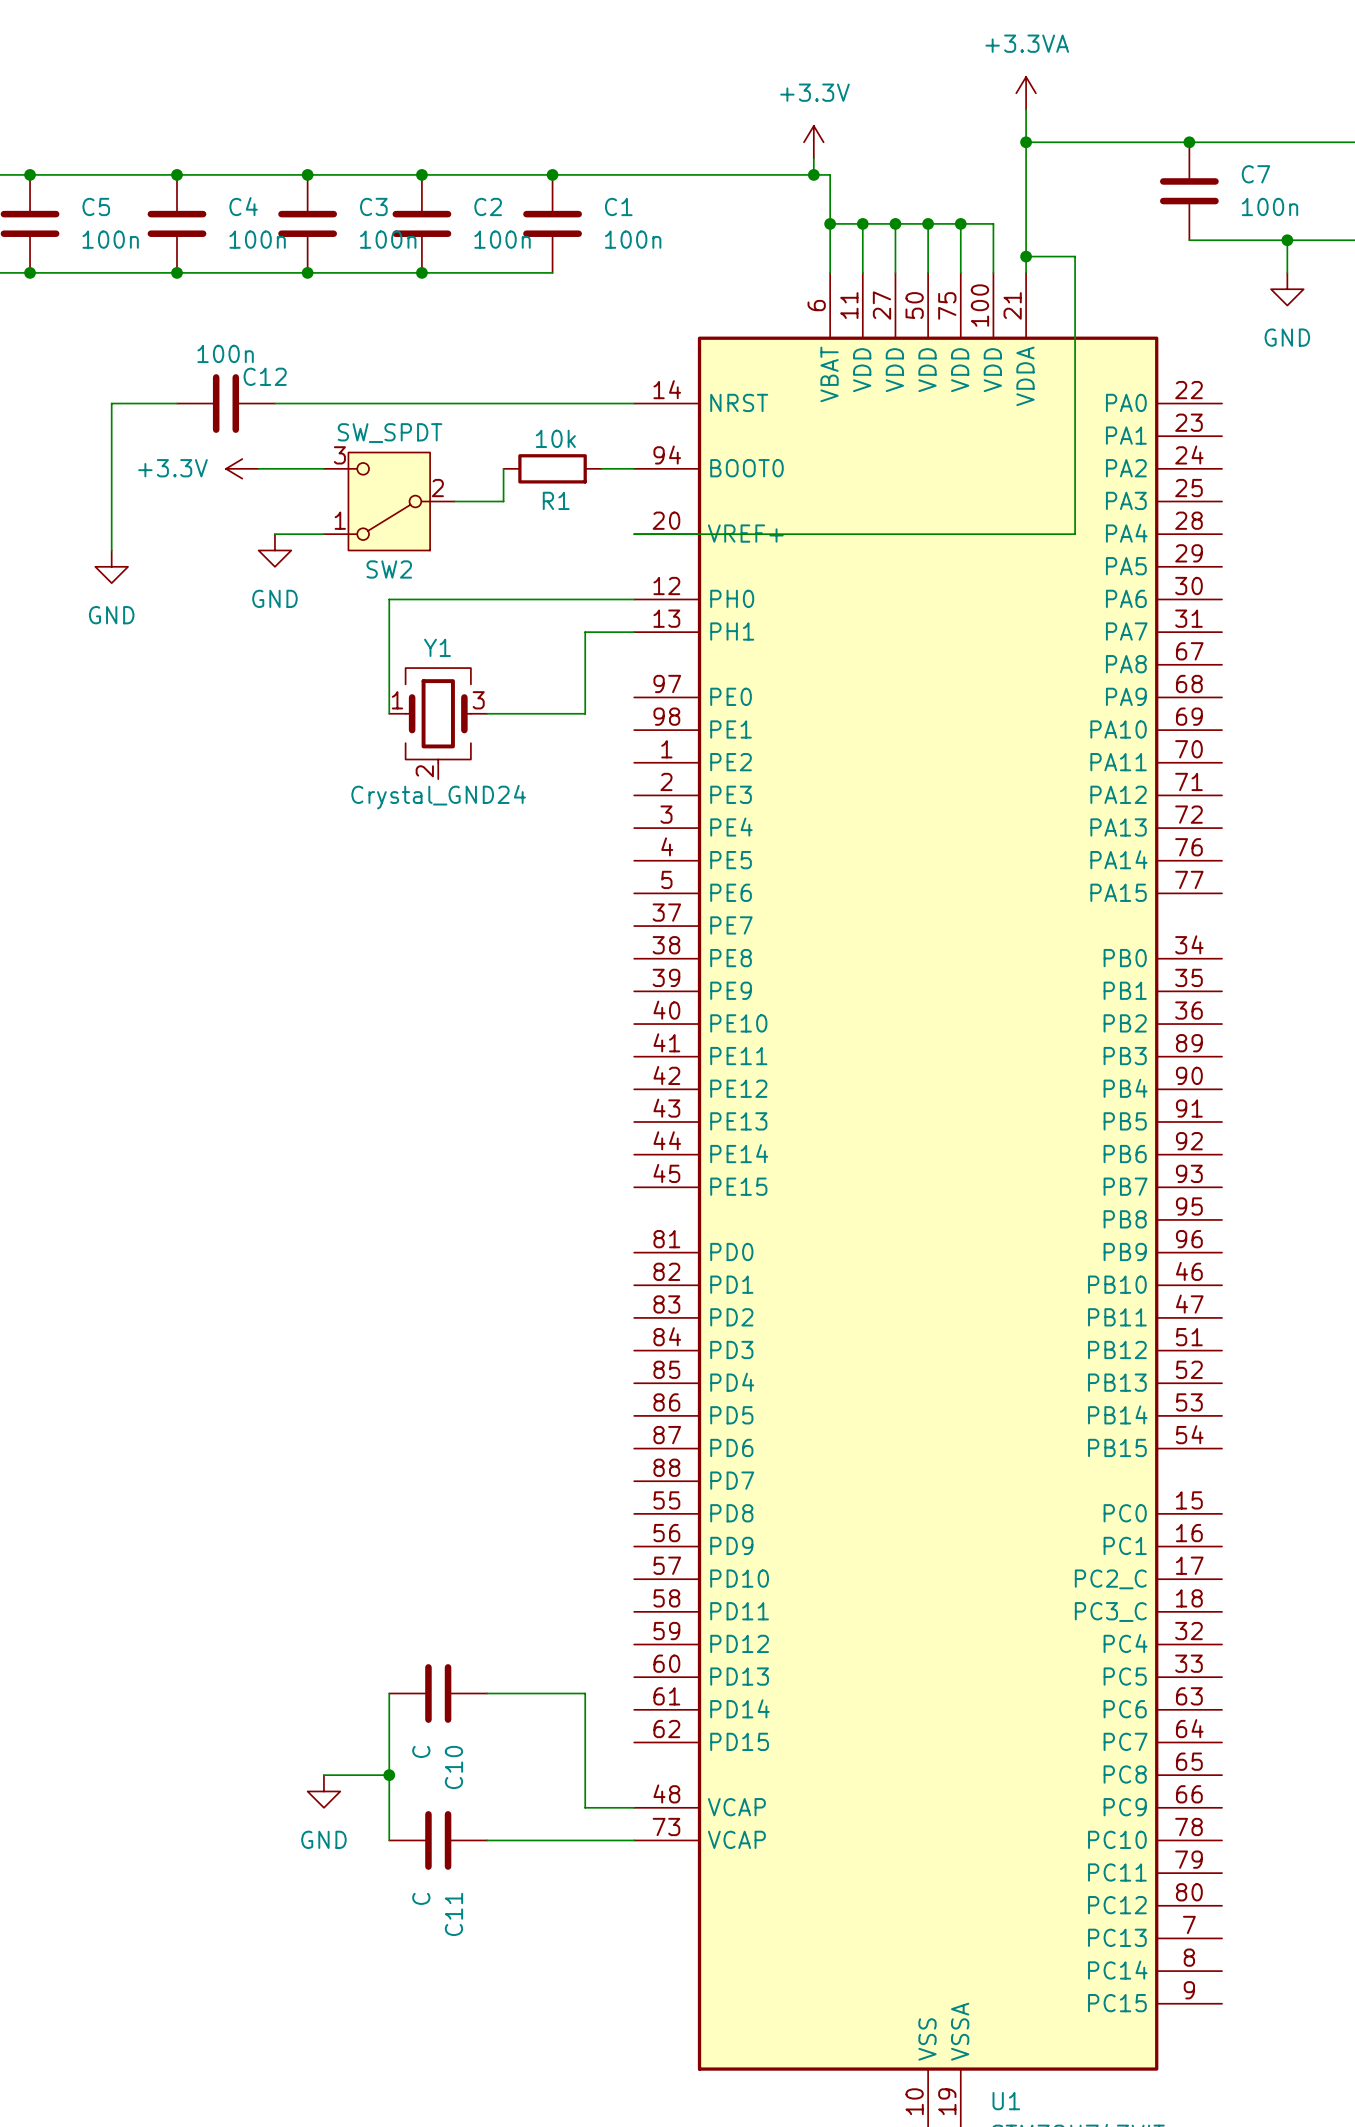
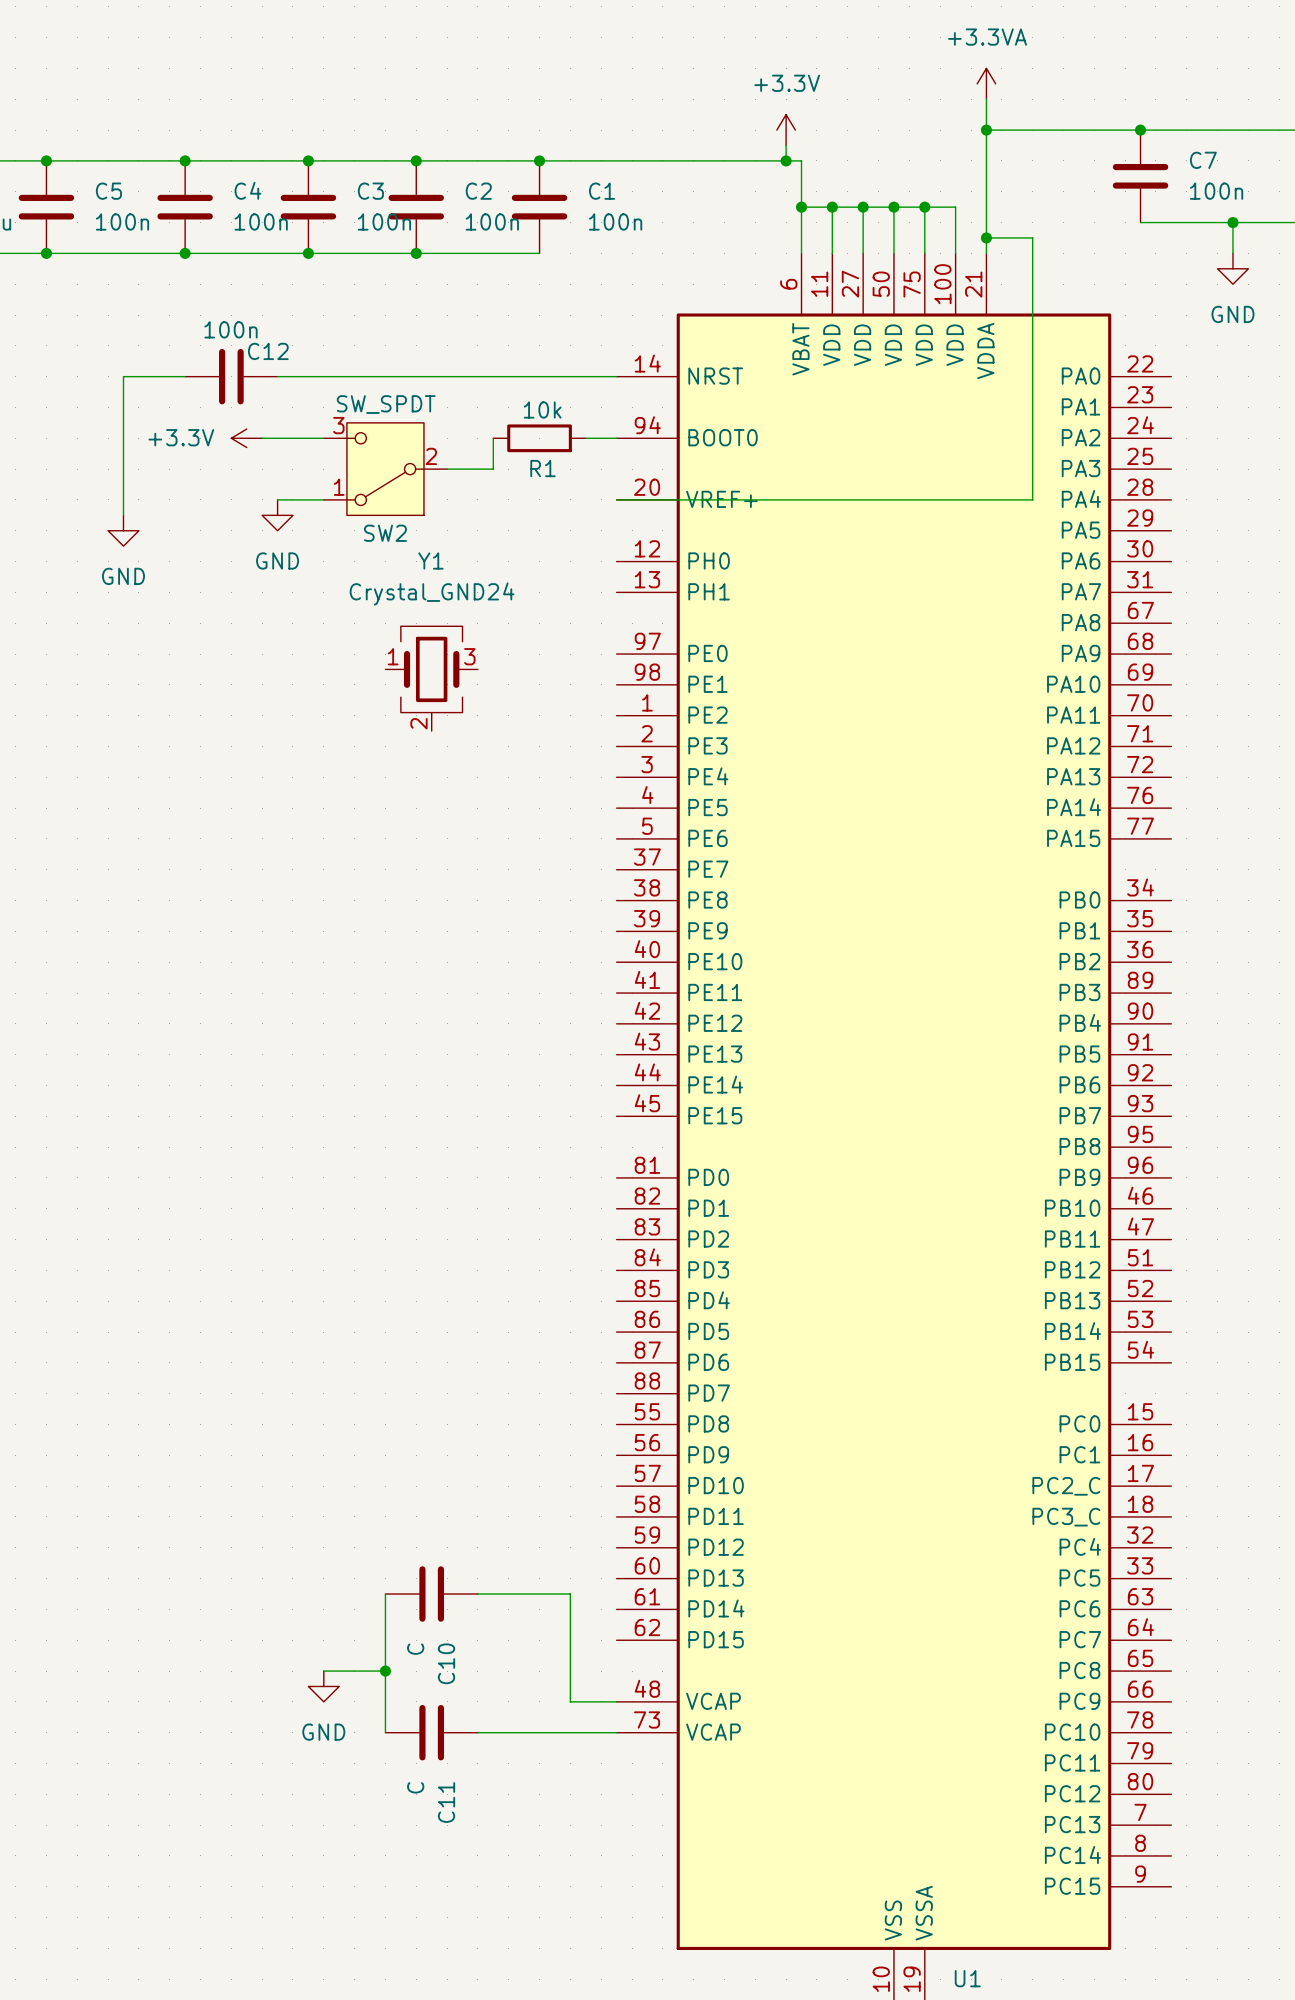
wire: (634, 599) (389, 599) (389, 713) -> none
wire: (634, 632) (585, 632) (585, 713) (487, 713) -> none
Y1 name position: Y1 (437, 647) -> Y1 (430, 560)
Y1 value position: Crystal_GND24 (438, 797) -> Crystal_GND24 (432, 594)

